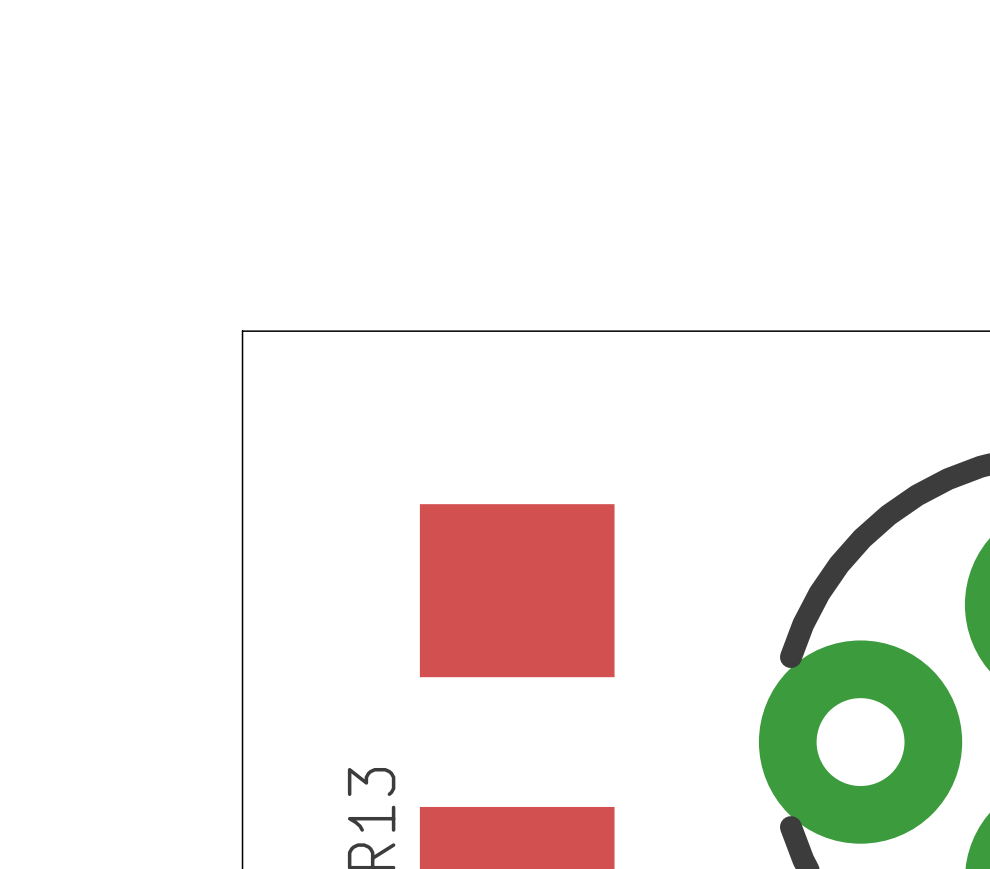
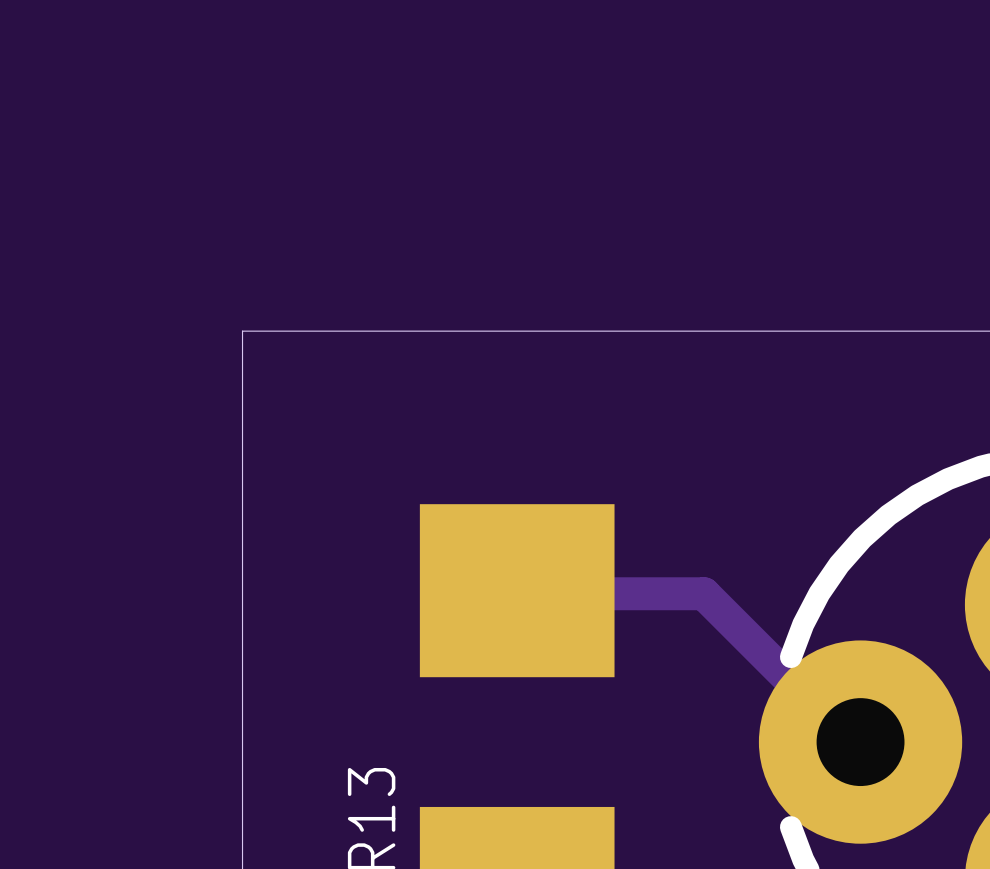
track: none -> (517, 590) (522, 593) (703, 593) (852, 742) (860, 742)

